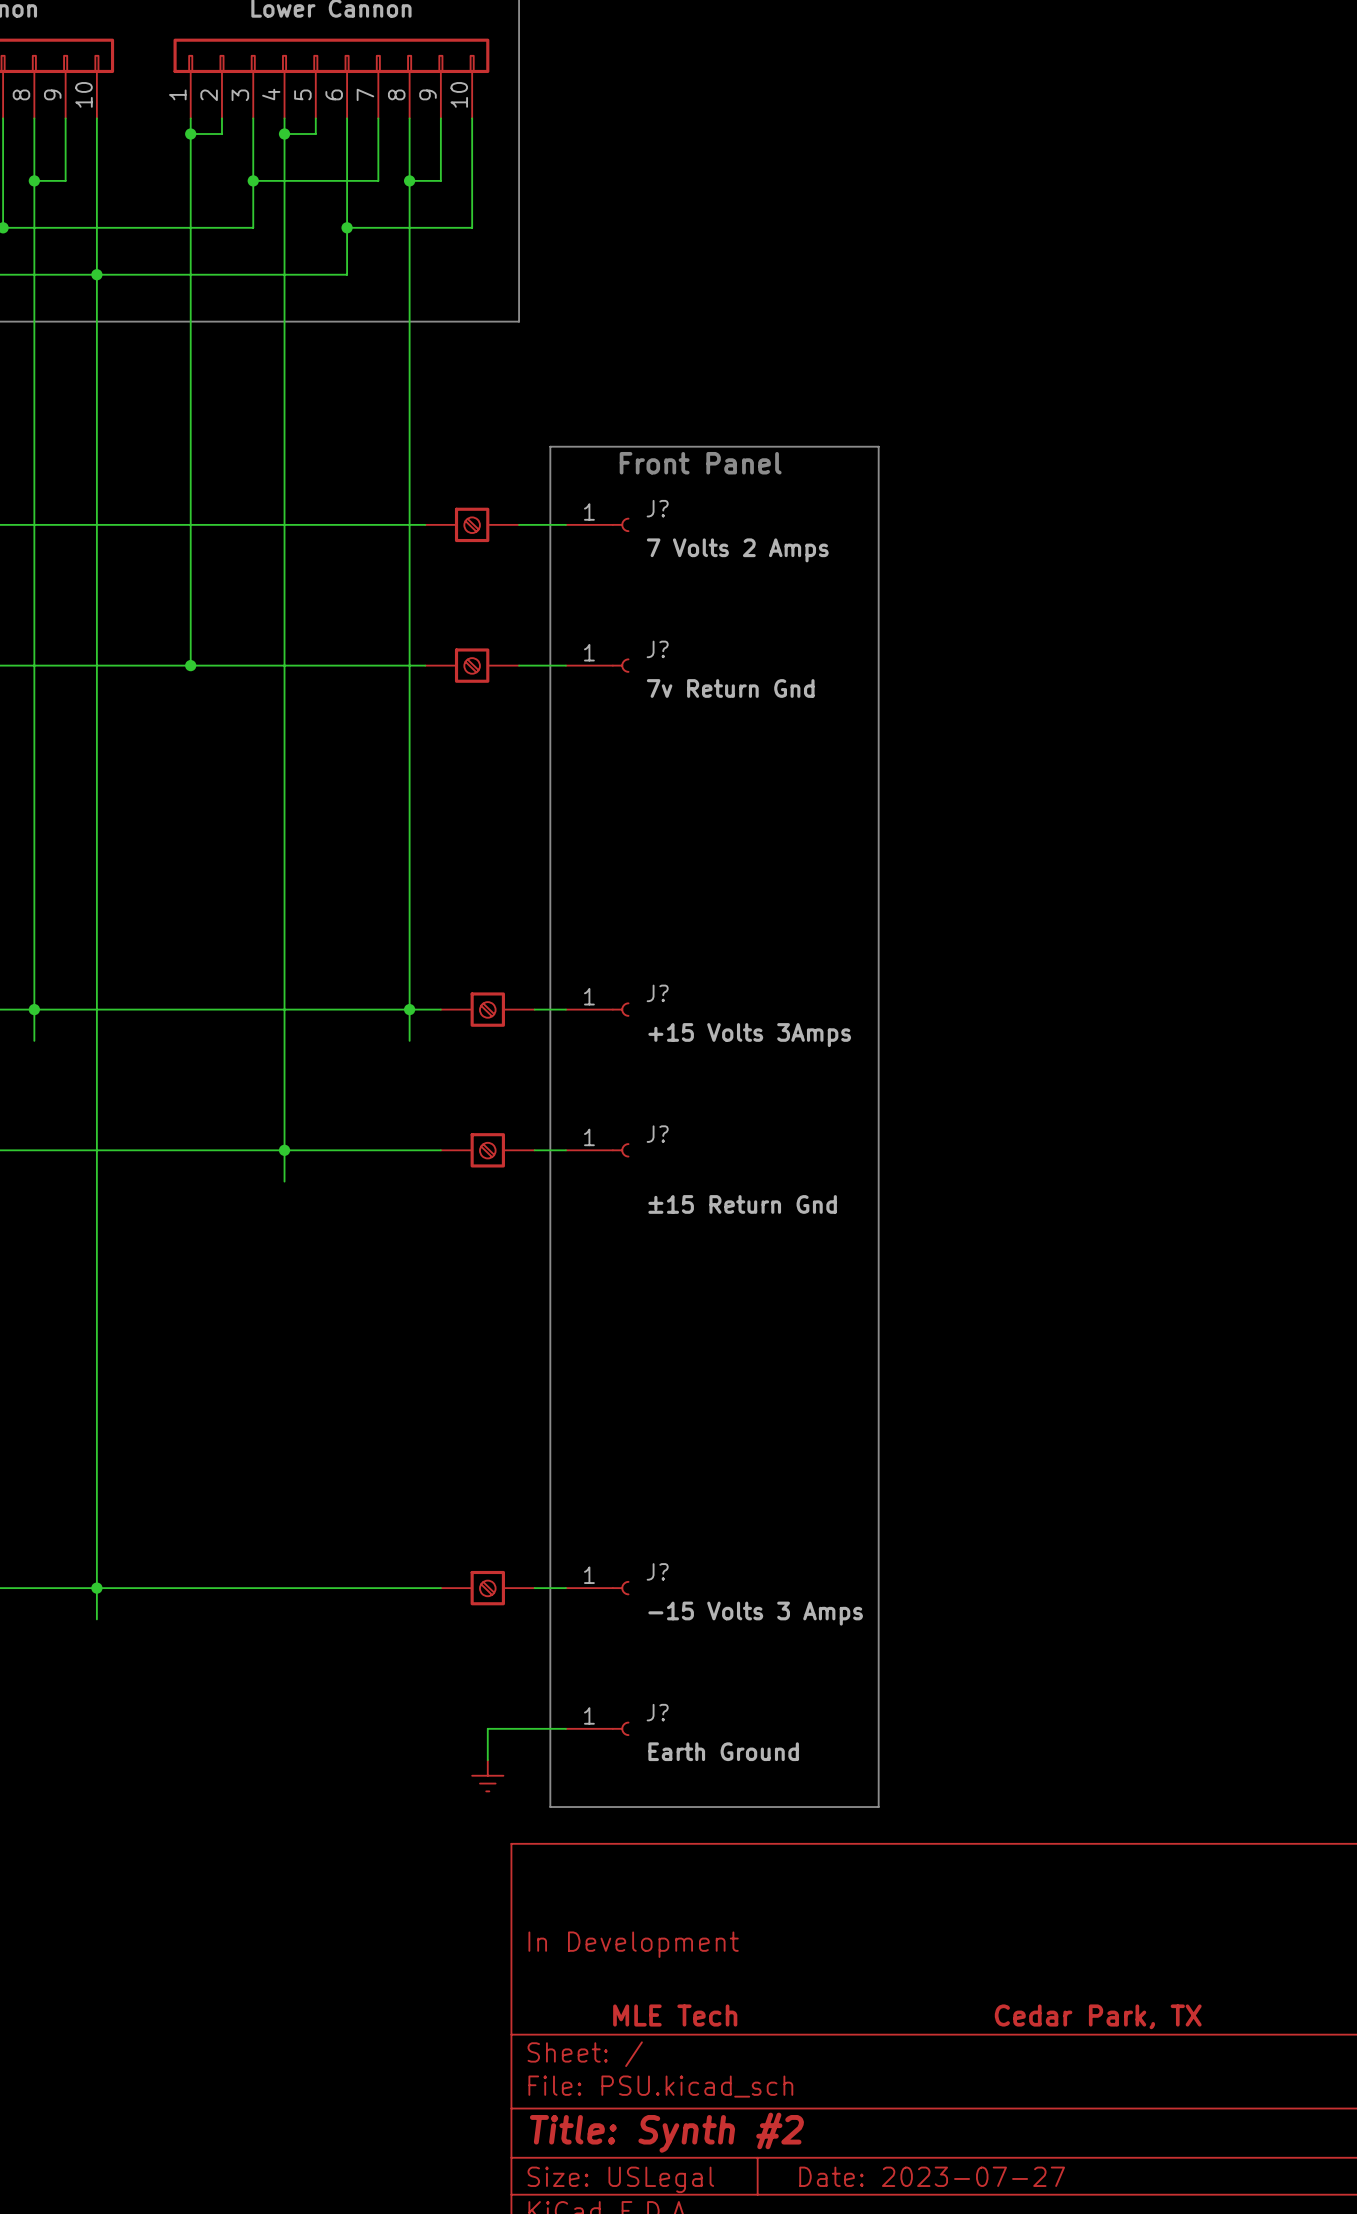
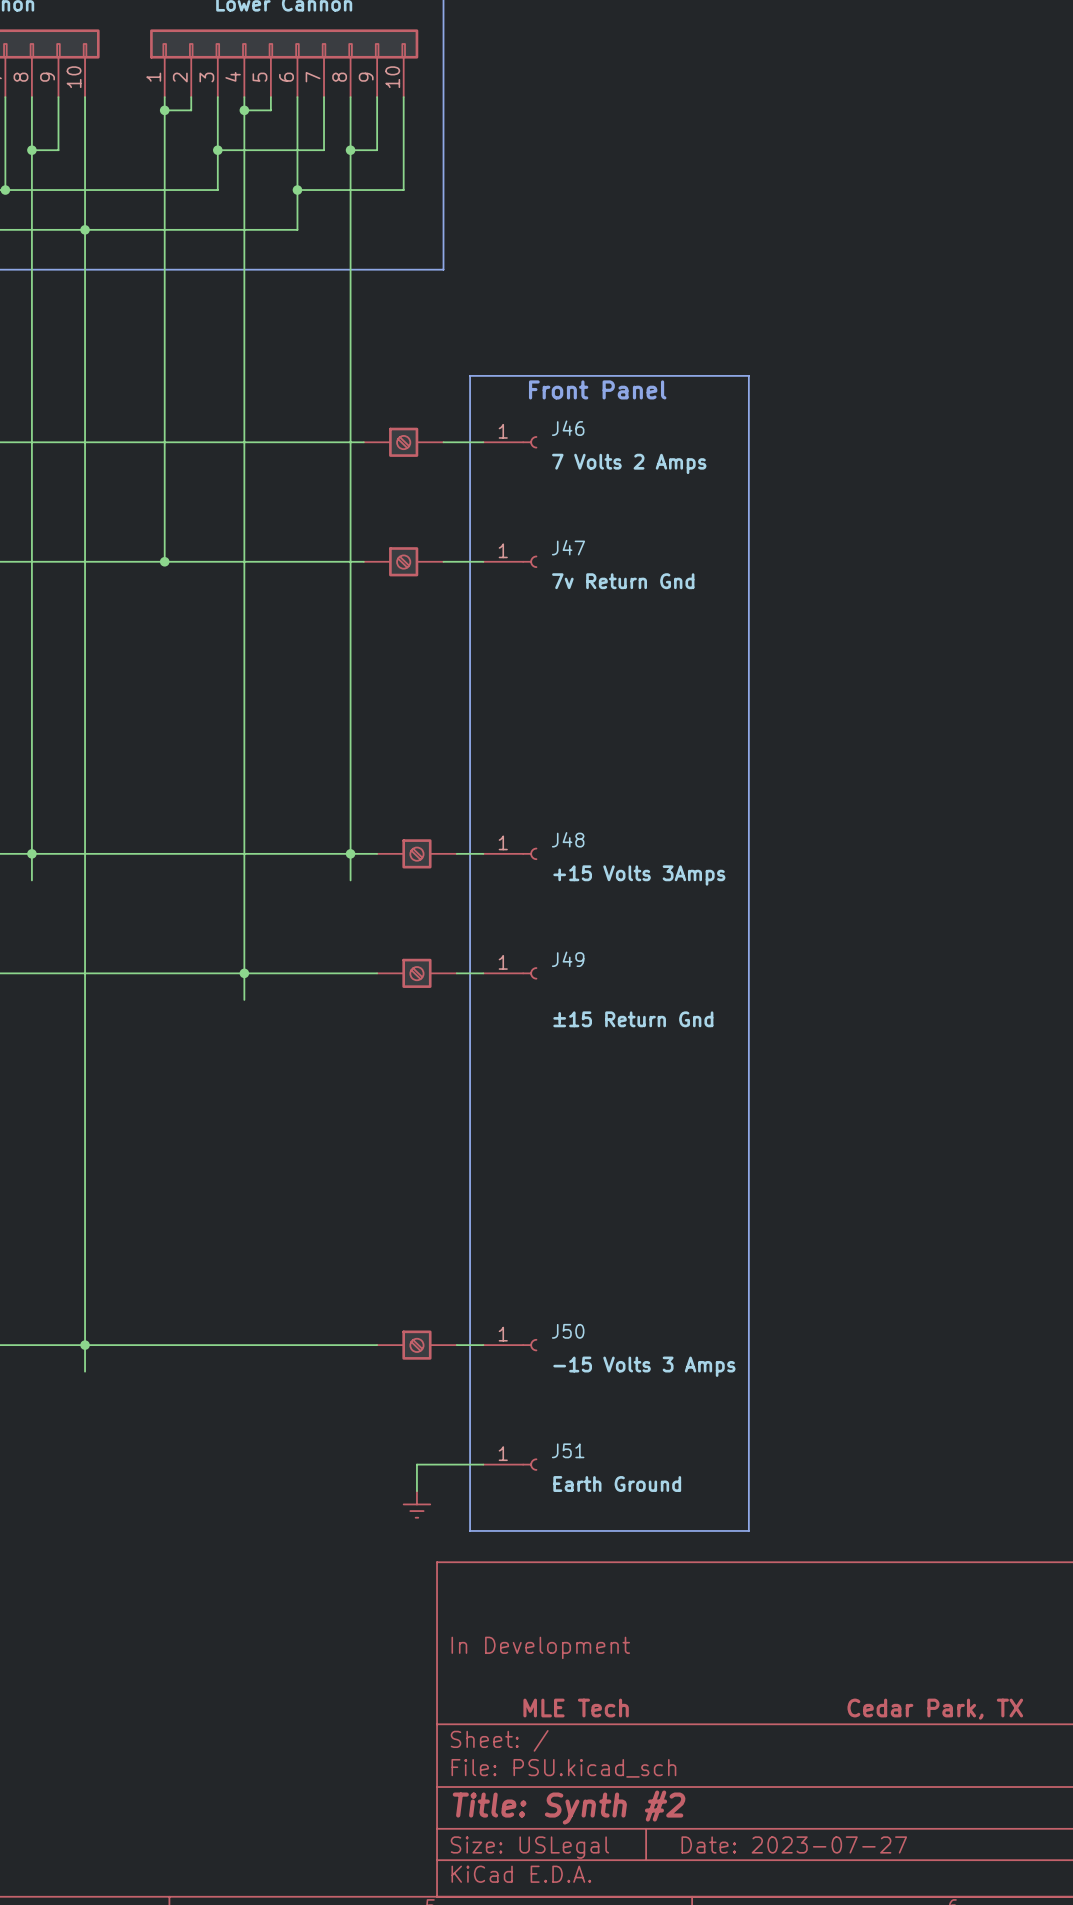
J? name: J? (657, 508) -> J46 (568, 428)
J? name: J? (657, 649) -> J47 (568, 547)
J? name: J? (657, 993) -> J48 (568, 839)
J? name: J? (657, 1134) -> J49 (568, 959)
J? name: J? (657, 1571) -> J50 (568, 1331)
J? name: J? (657, 1712) -> J51 (568, 1450)

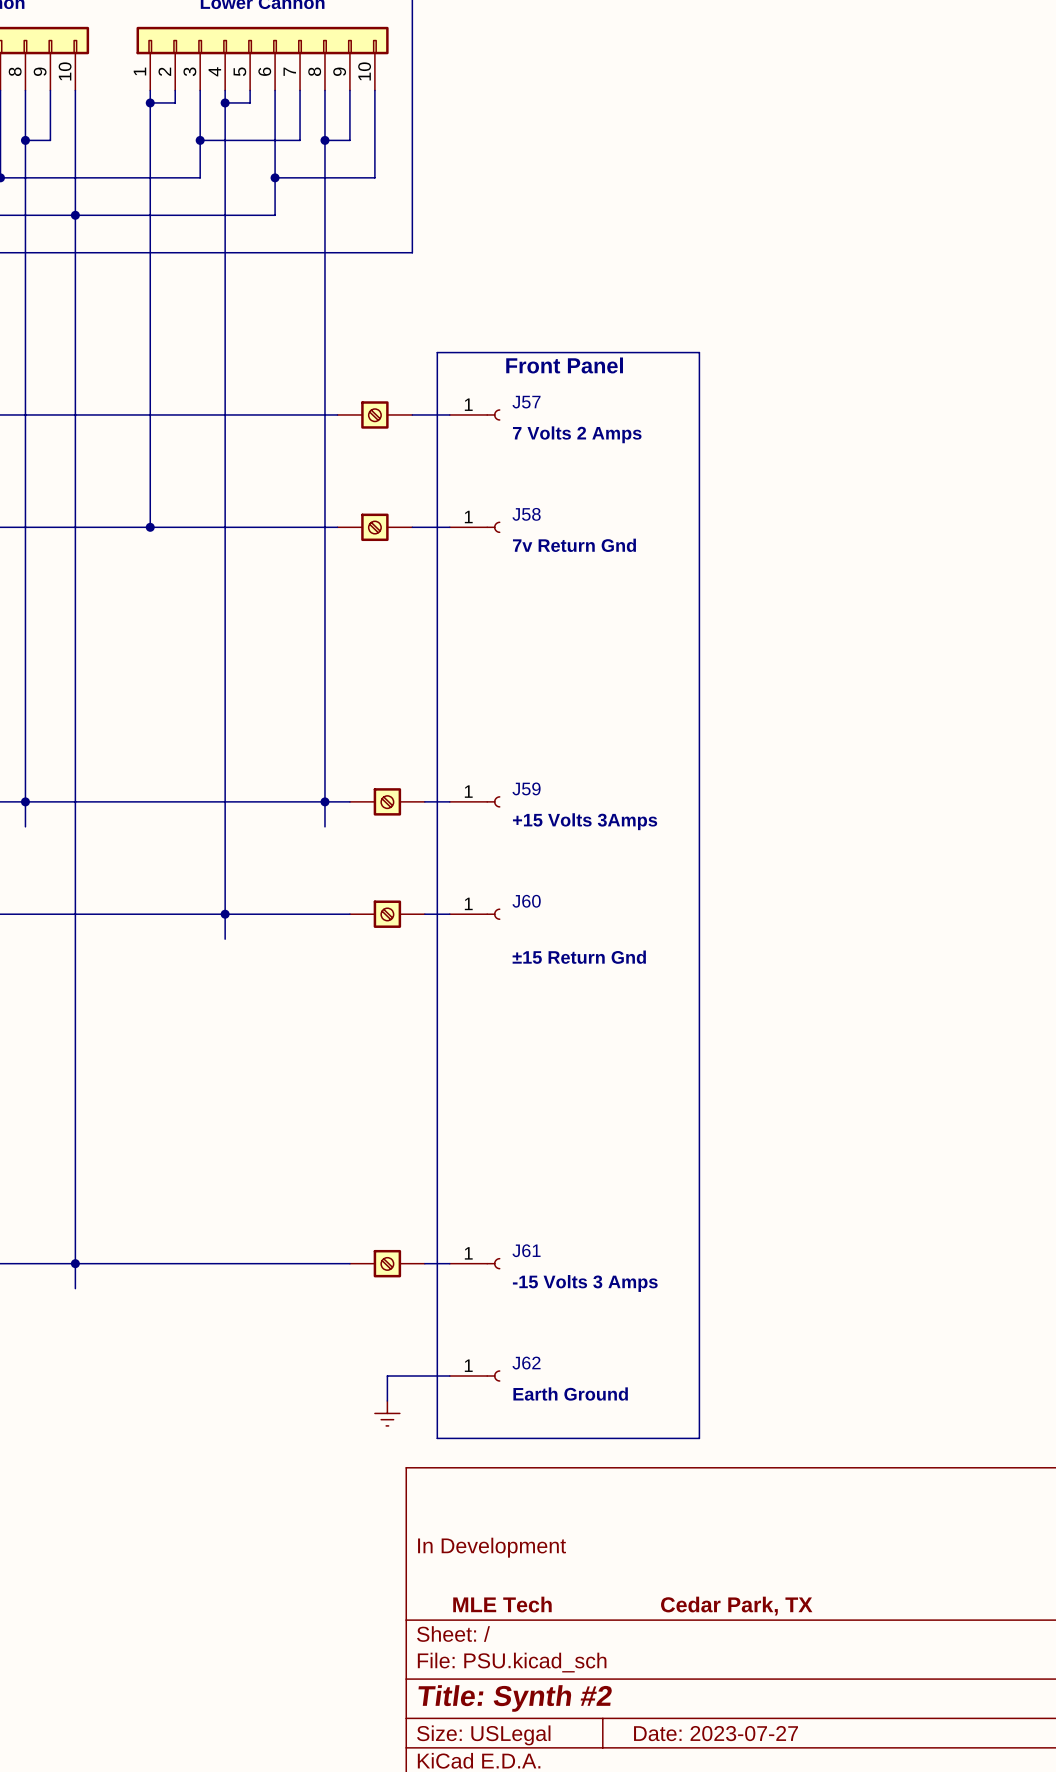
J46 name: J46 (568, 428) -> J57 (526, 402)
J47 name: J47 (568, 547) -> J58 (526, 514)
J48 name: J48 (568, 839) -> J59 (526, 788)
J49 name: J49 (568, 959) -> J60 (526, 901)
J50 name: J50 (568, 1331) -> J61 (526, 1250)
J51 name: J51 (568, 1450) -> J62 (526, 1363)

